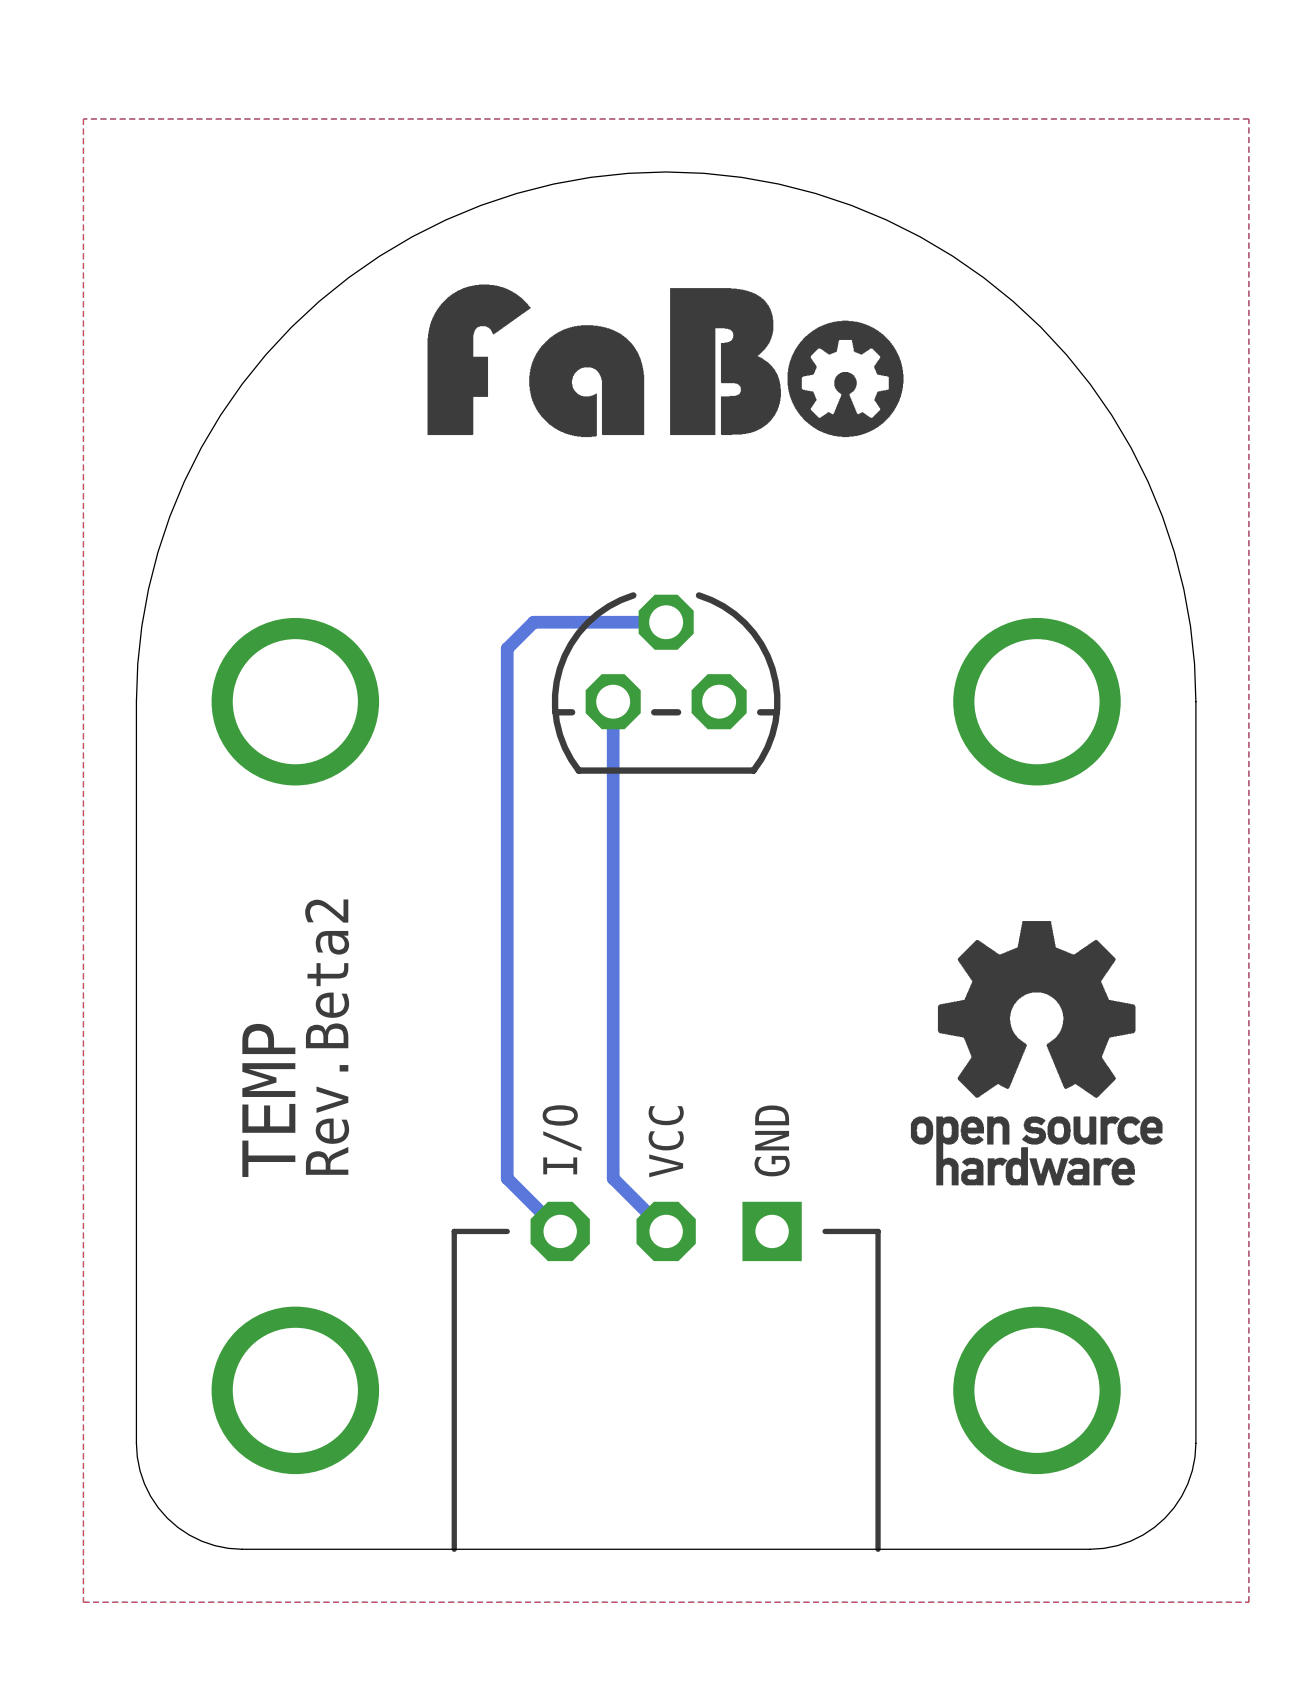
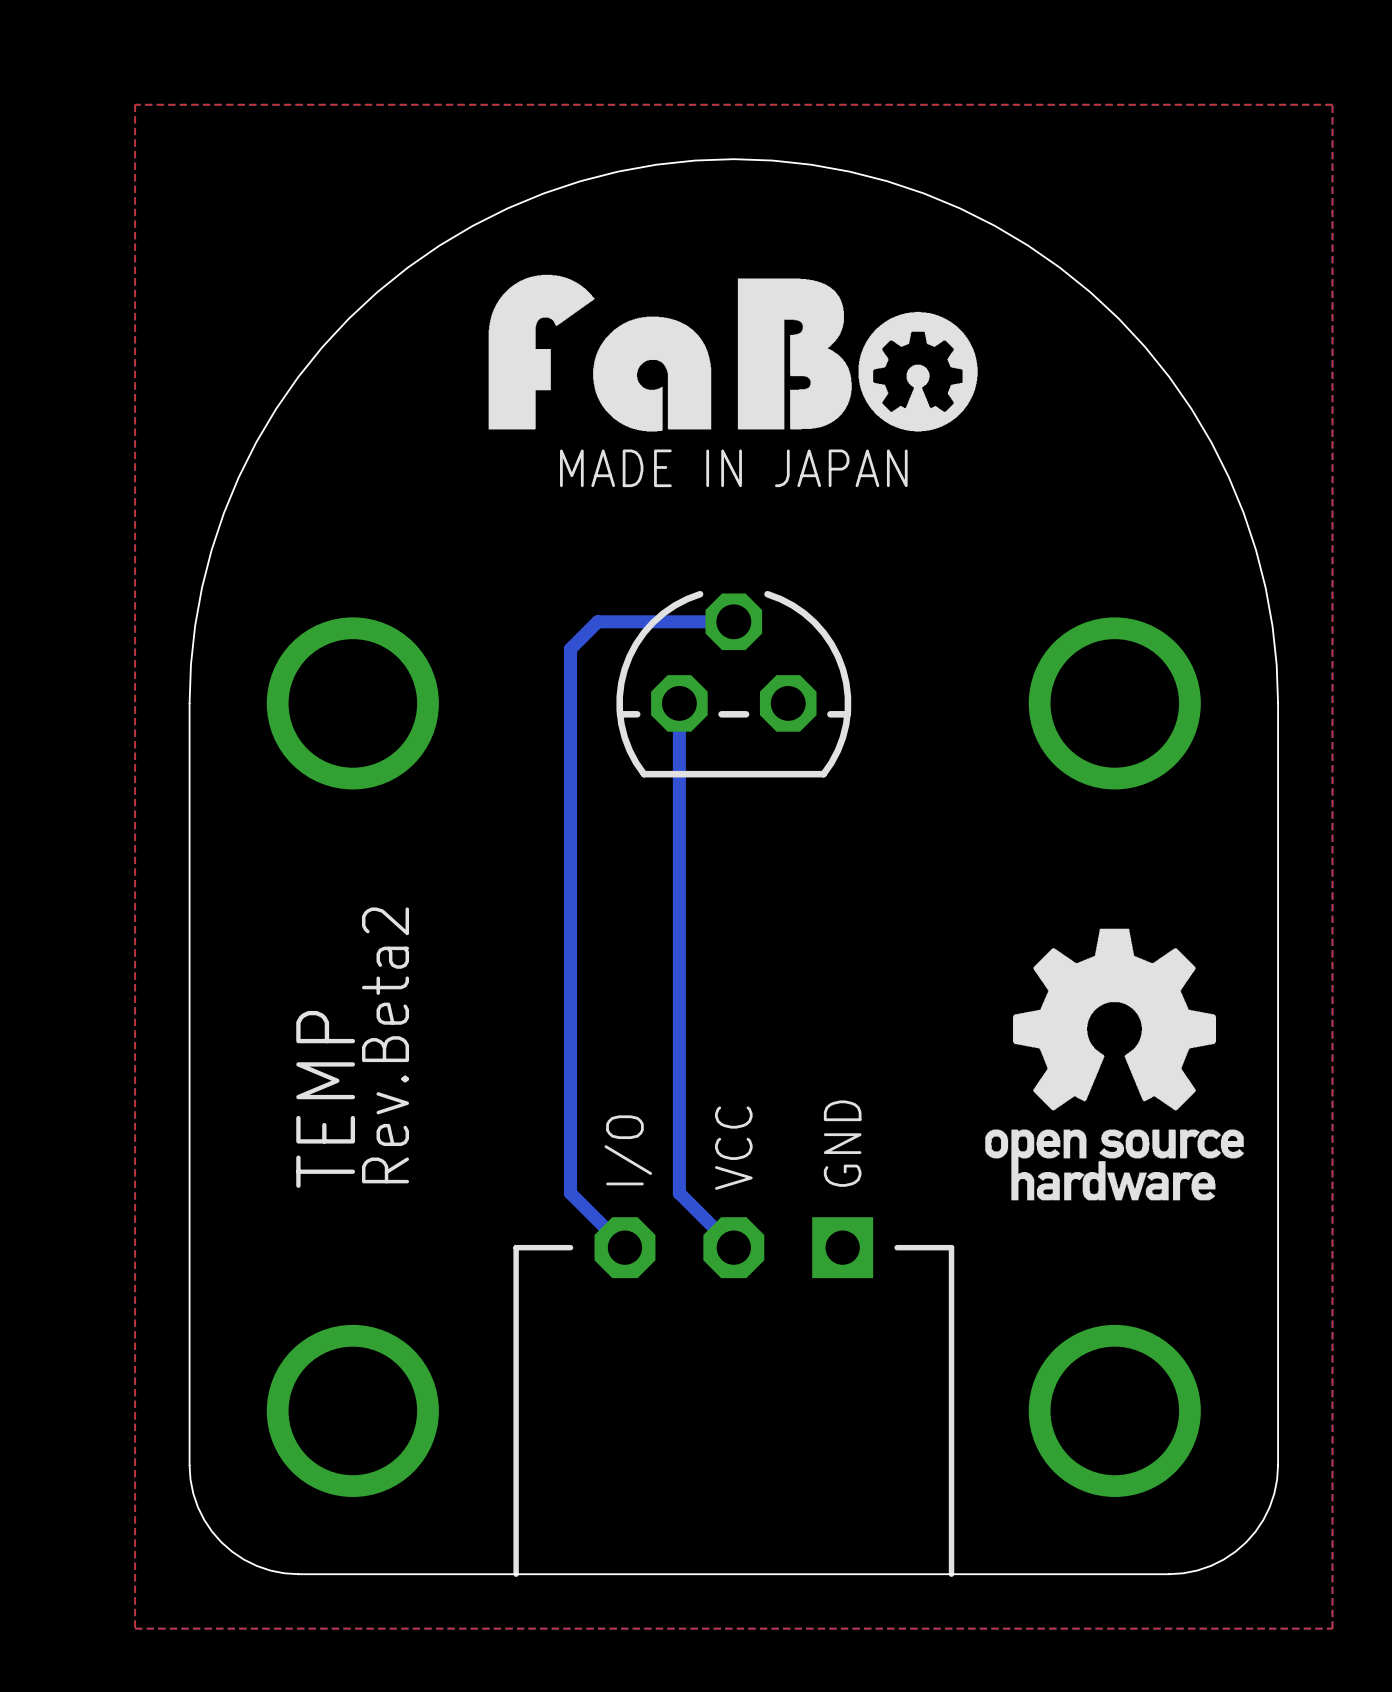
text: none -> MADE IN JAPAN (733, 468)

